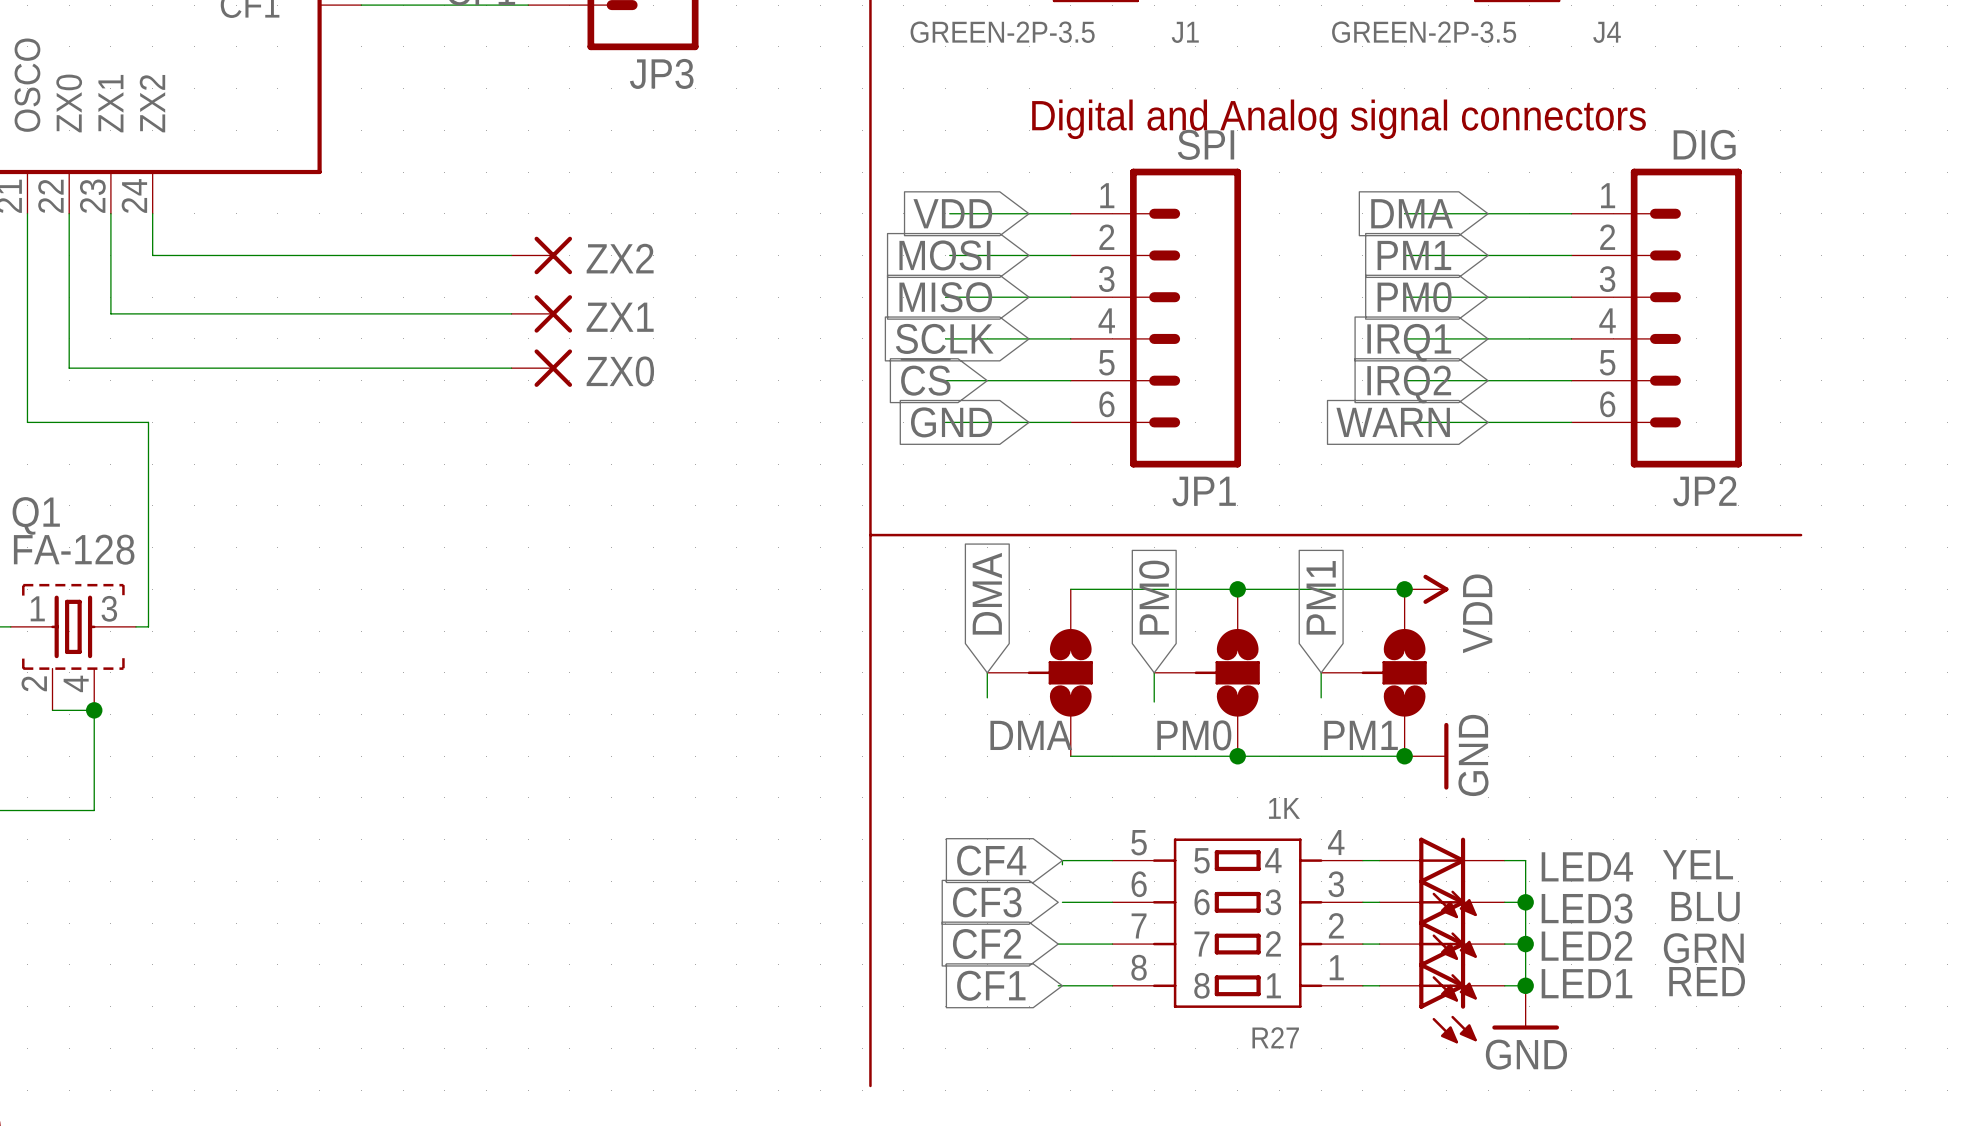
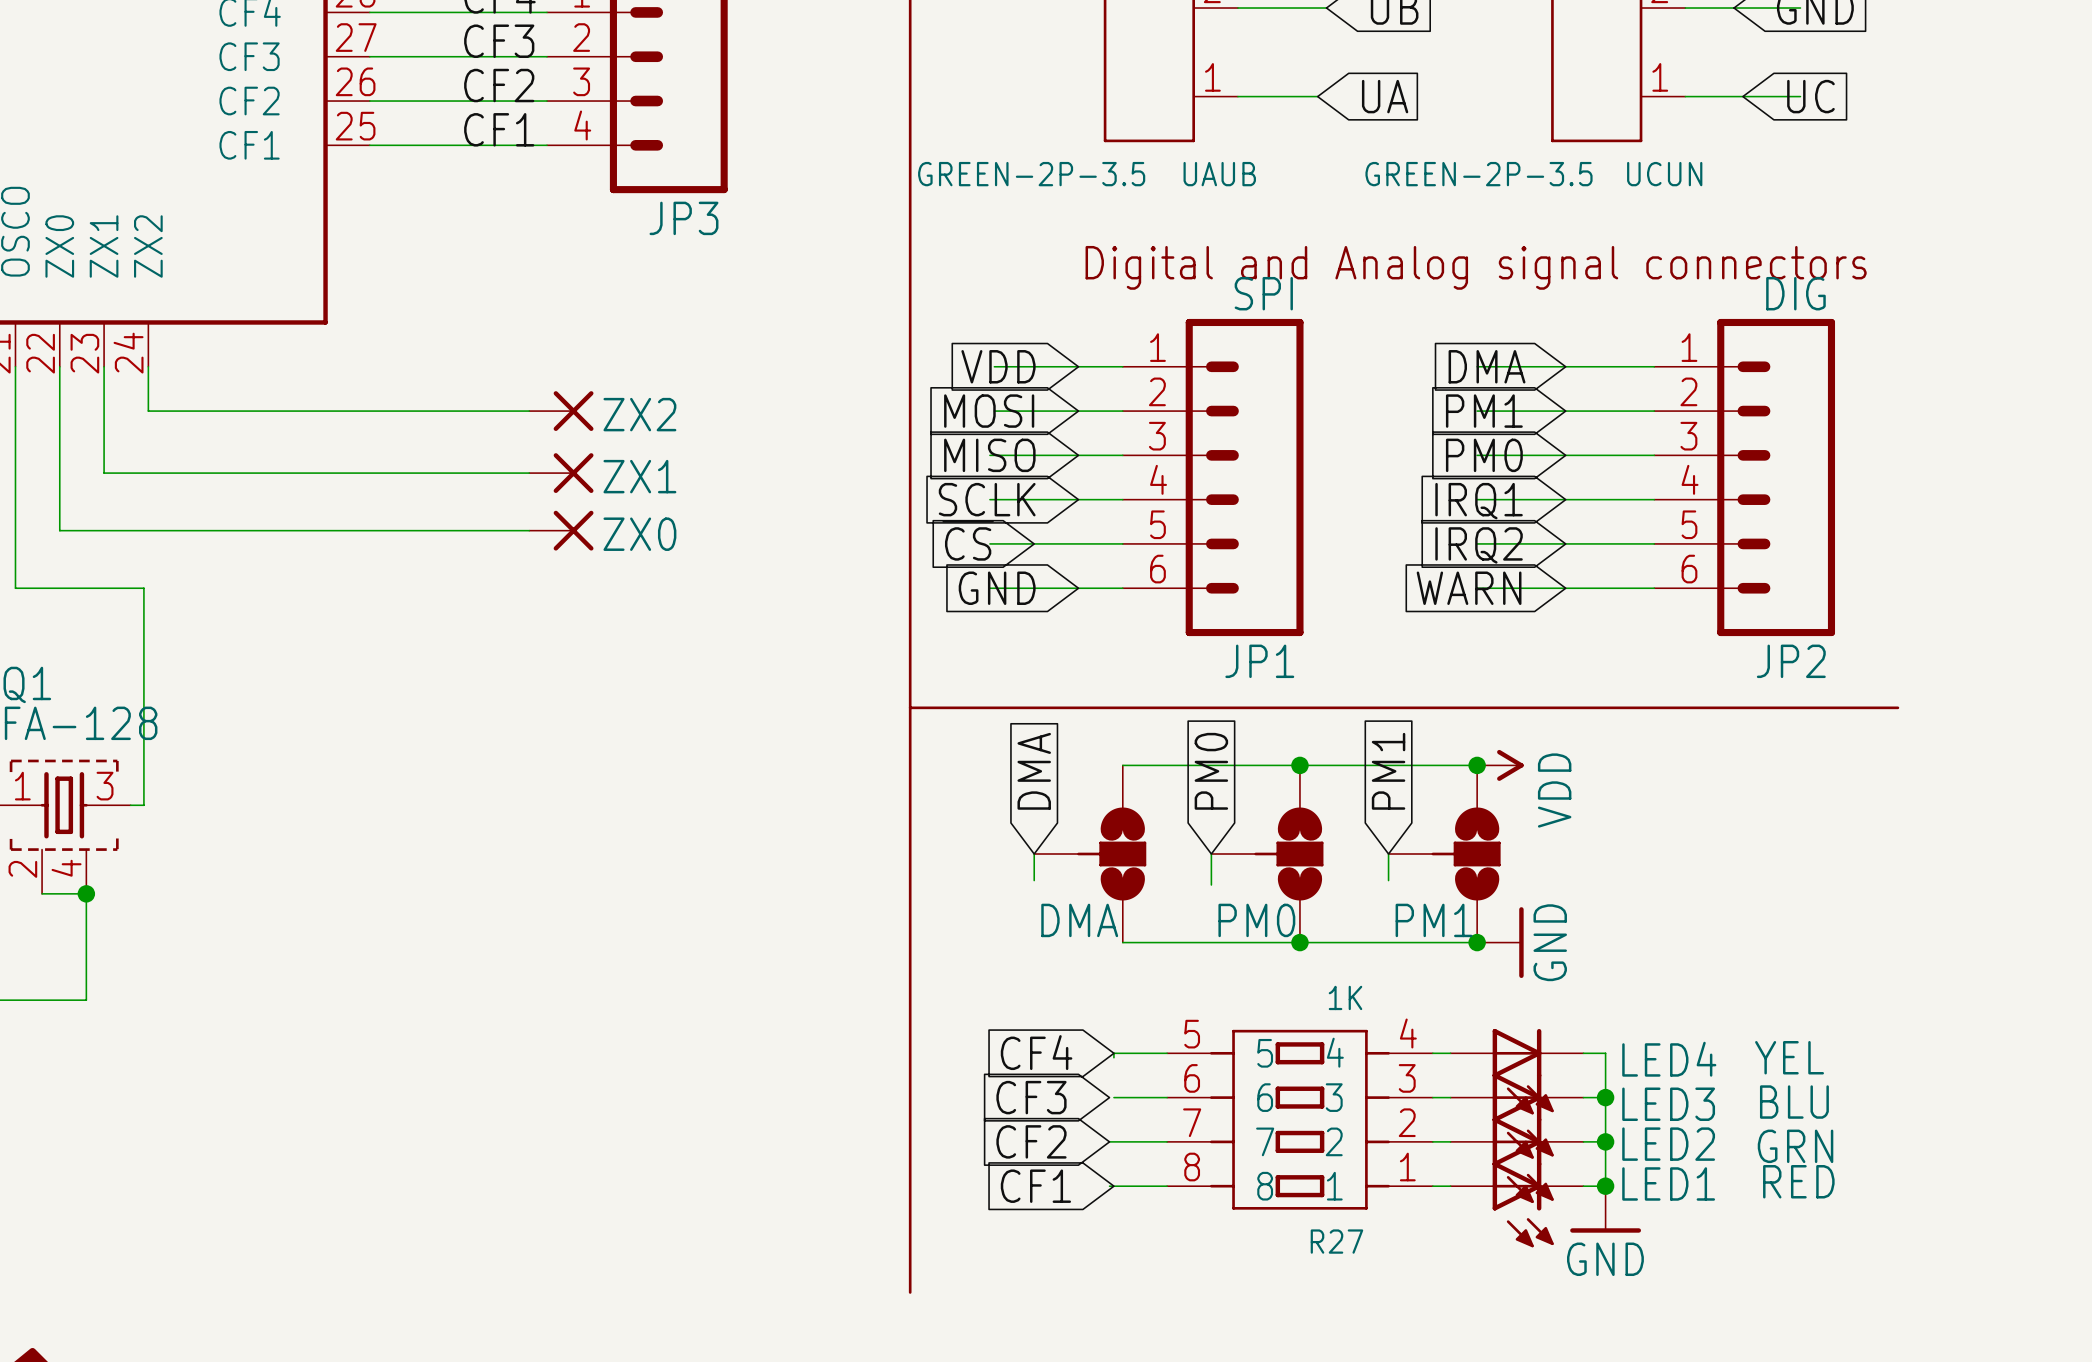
J1 name: J1 (1185, 32) -> UAUB (1219, 174)
J4 name: J4 (1607, 32) -> UCUN (1664, 174)

